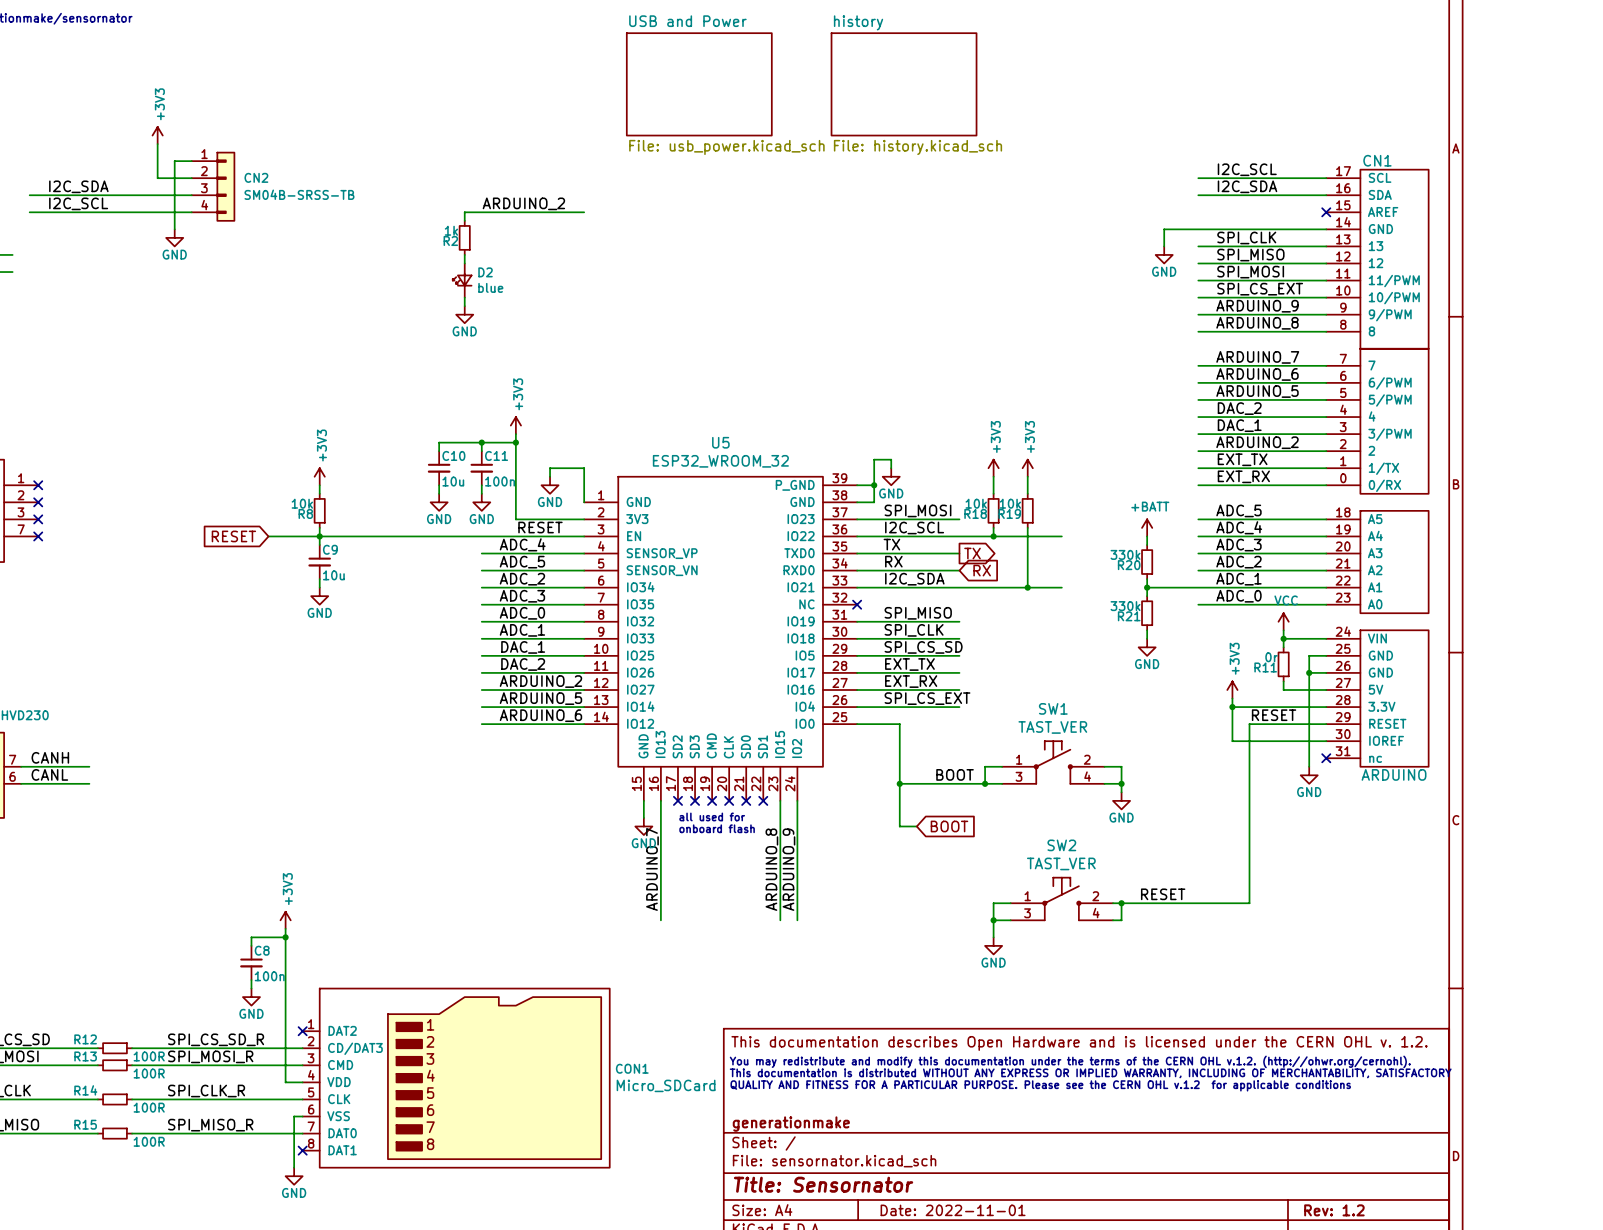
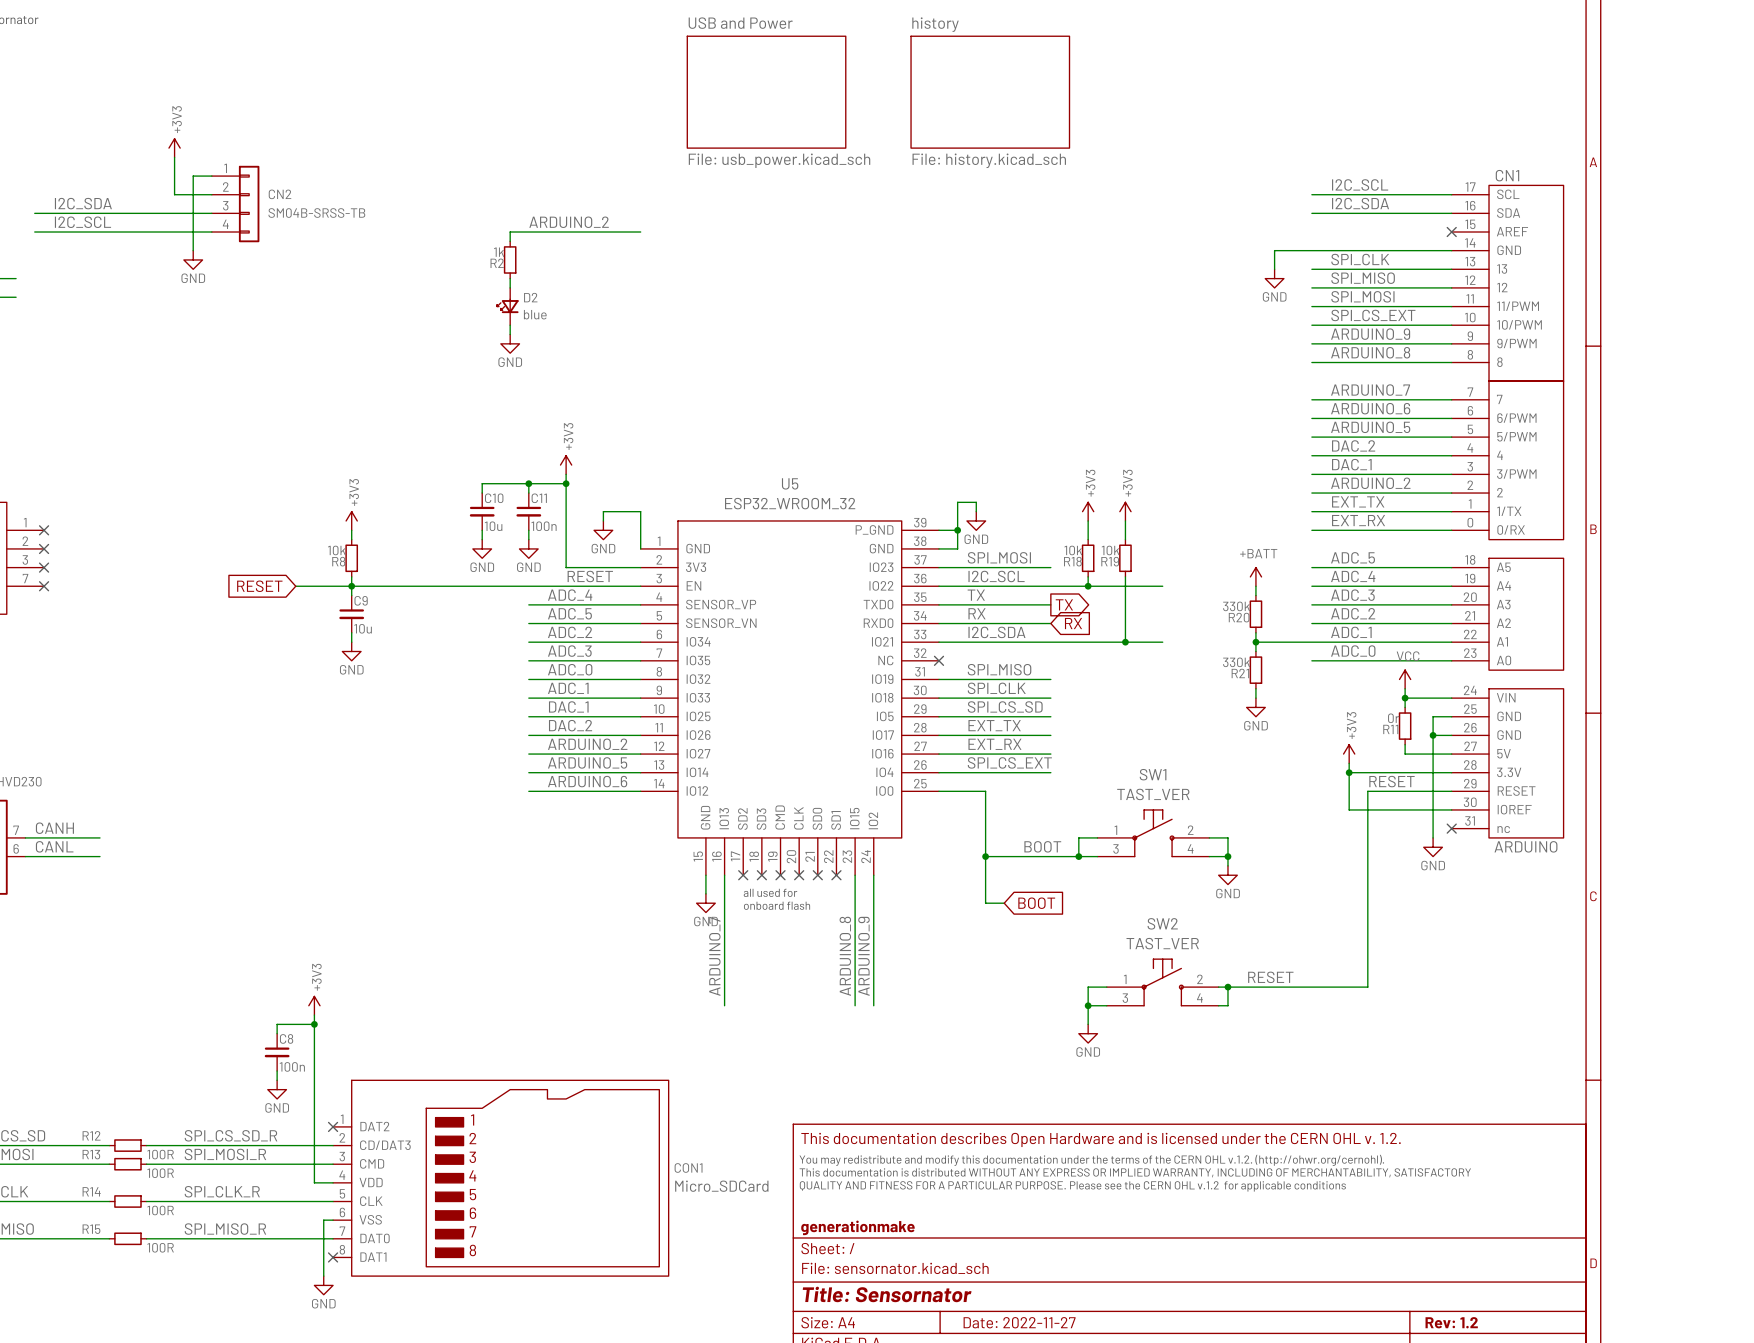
title block: Date: 2022-11-01 (953, 1210) -> Date: 2022-11-27 (1019, 1322)

